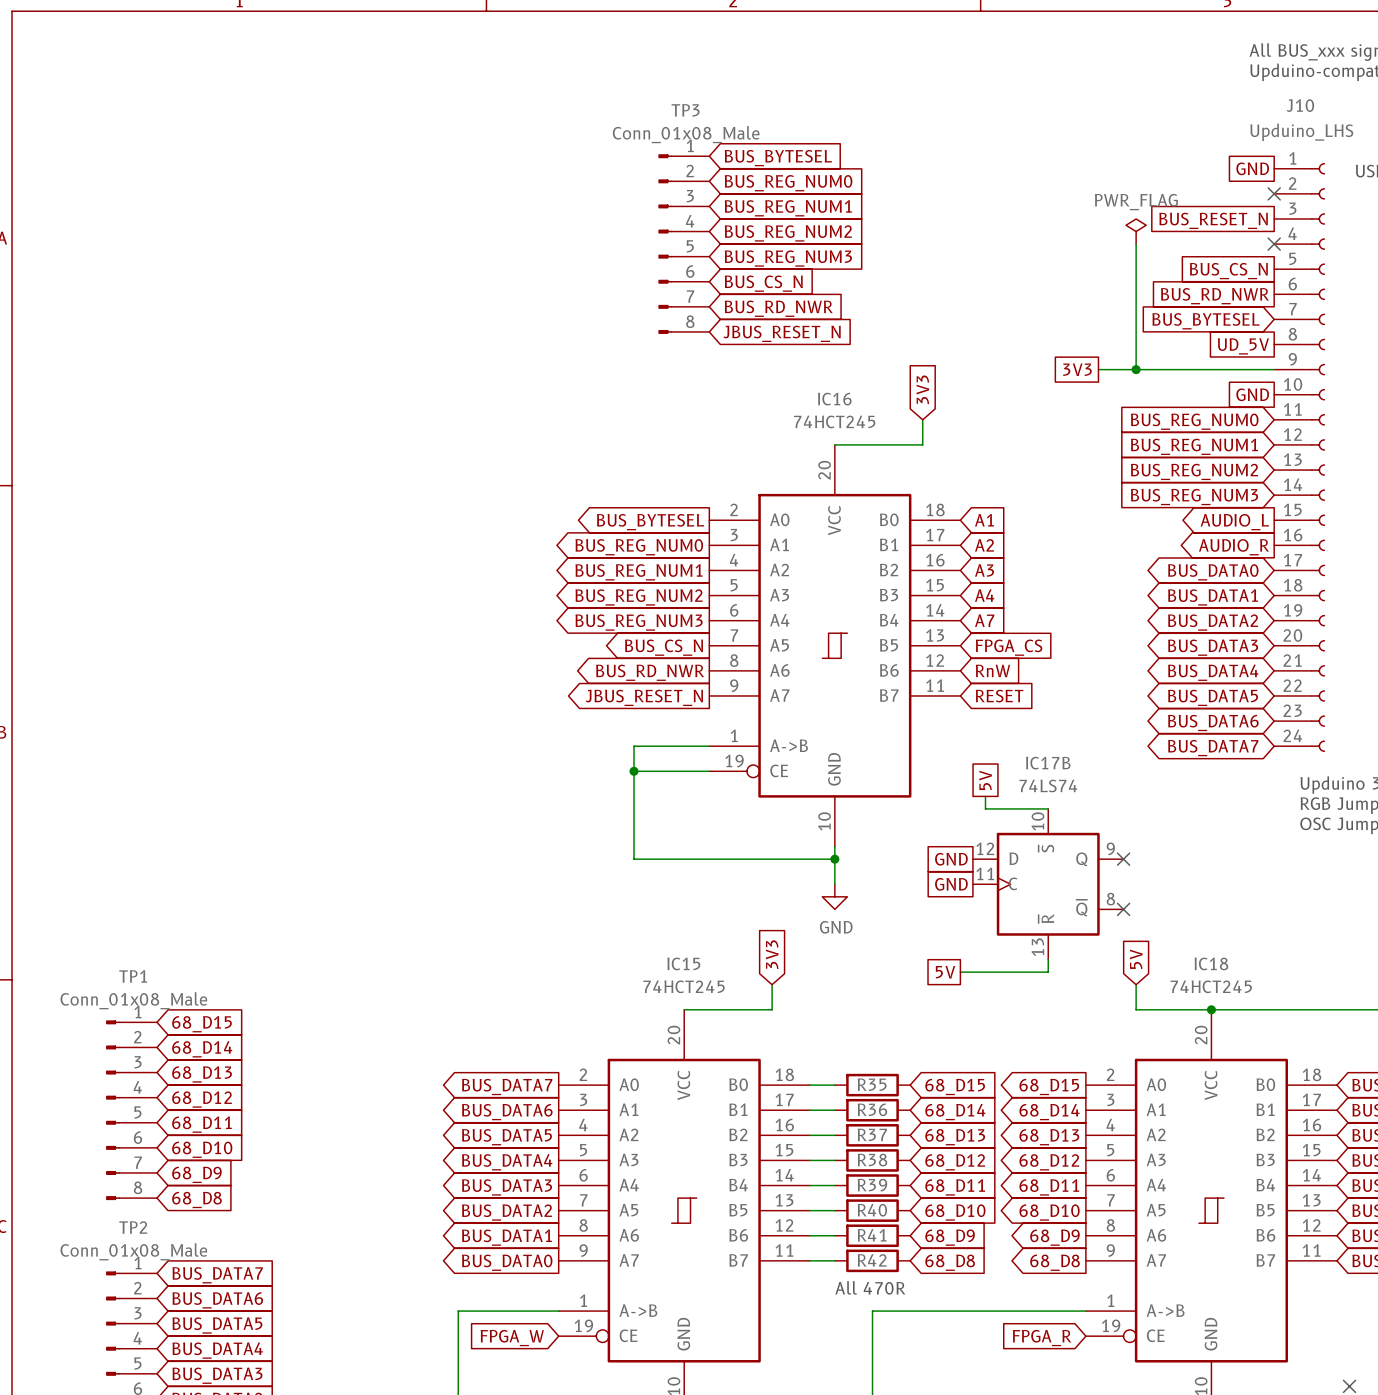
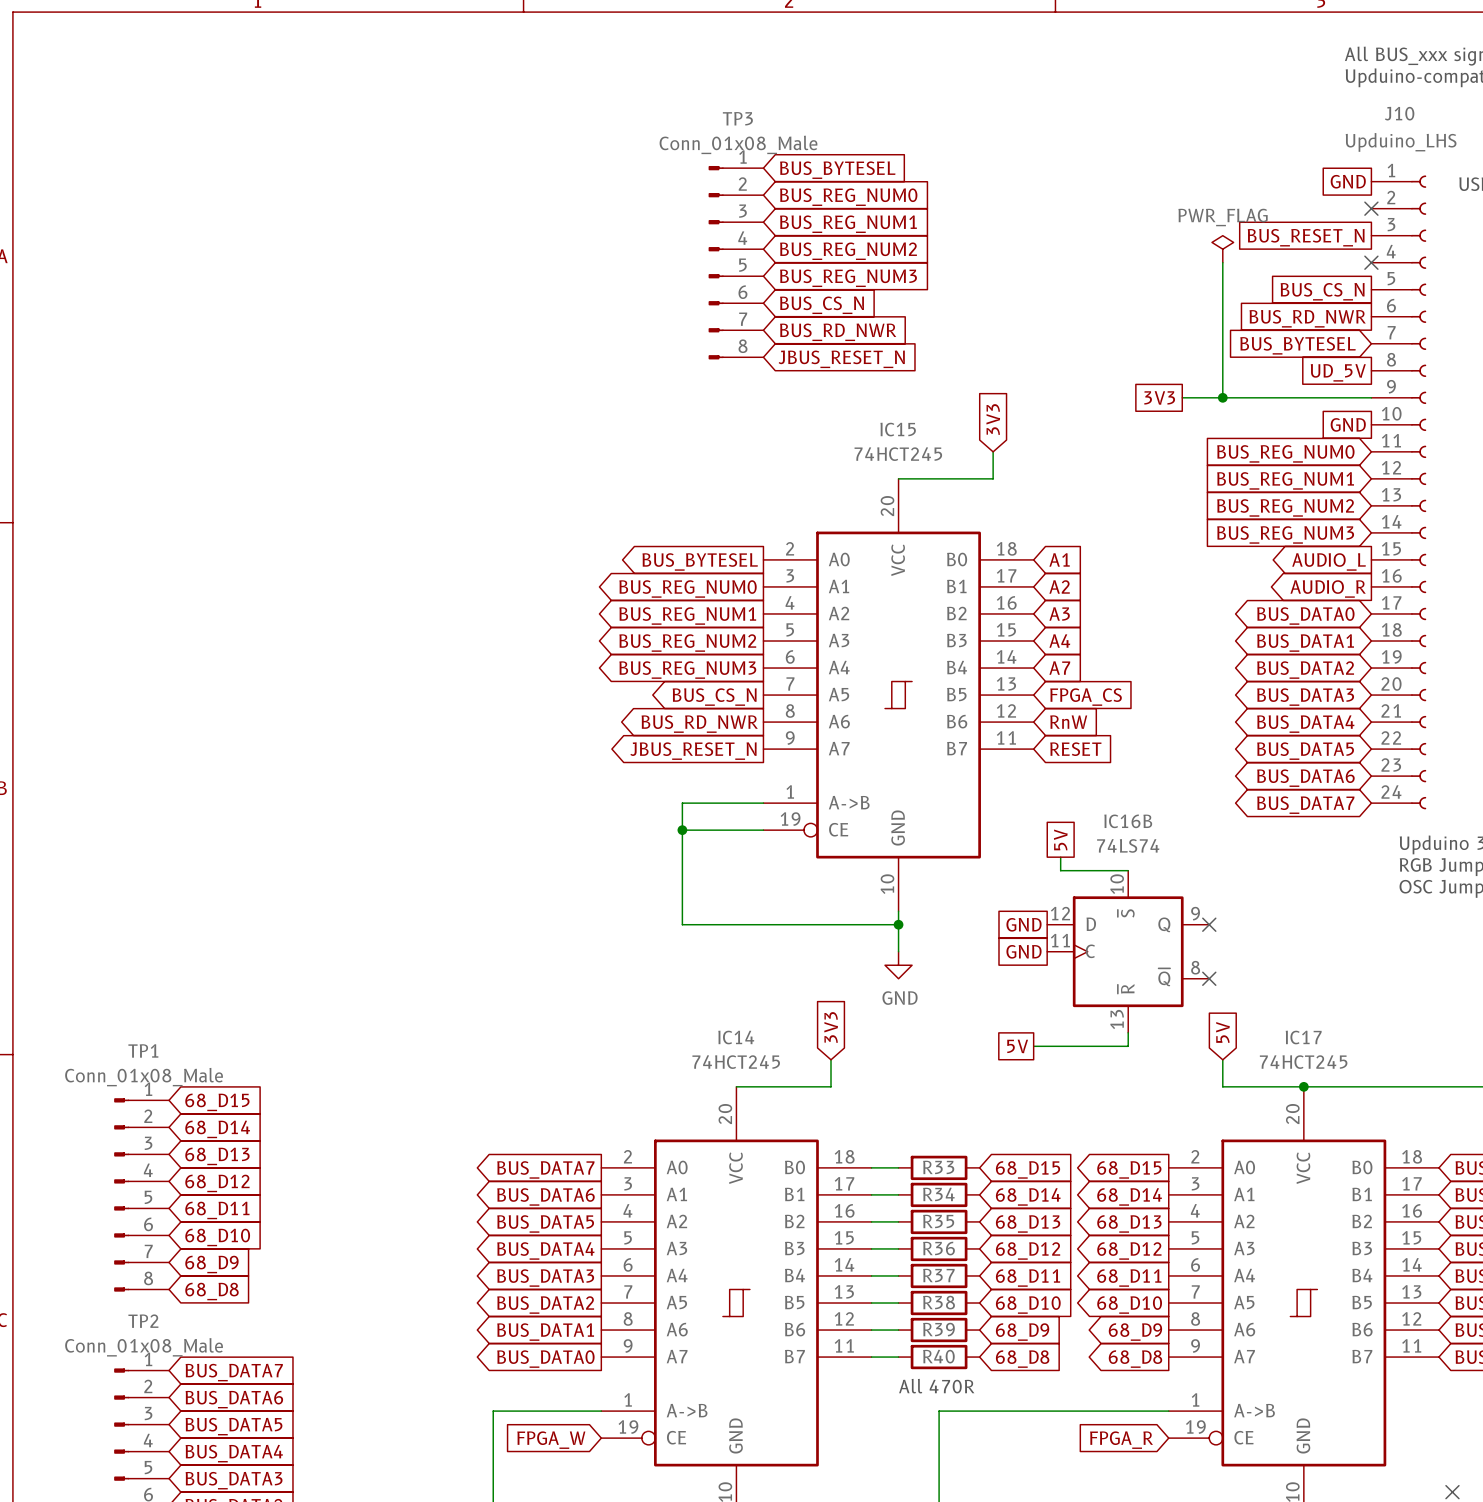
IC16 name: IC16 (834, 399) -> IC15 (898, 429)
IC17B name: IC17B (1048, 763) -> IC16B (1128, 821)
IC15 name: IC15 (683, 963) -> IC14 (736, 1037)
IC18 name: IC18 (1211, 963) -> IC17 (1303, 1037)
R35 name: R35 (872, 1084) -> R33 (938, 1167)
R36 name: R36 (872, 1109) -> R34 (938, 1194)
R37 name: R37 (872, 1134) -> R35 (938, 1221)
R38 name: R38 (872, 1160) -> R36 (939, 1248)
R39 name: R39 (872, 1185) -> R37 (938, 1275)
R40 name: R40 (872, 1210) -> R38 (939, 1302)
R41 name: R41 (872, 1235) -> R39 (938, 1329)
R42 name: R42 (872, 1260) -> R40 (938, 1356)

